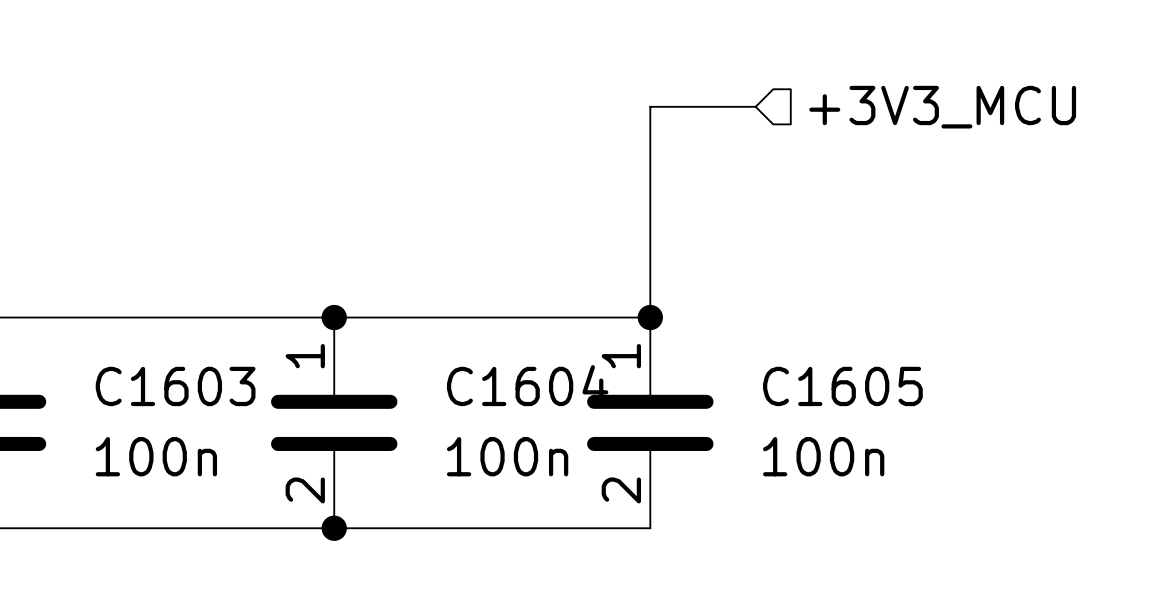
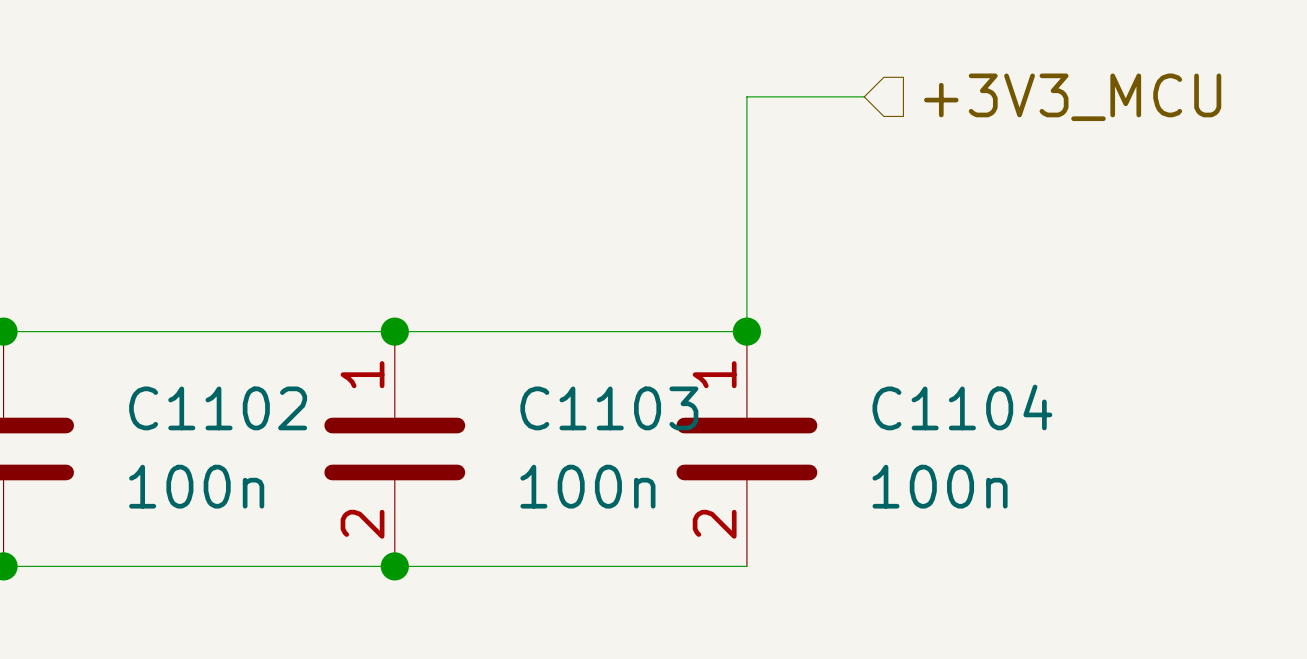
C1604 name: C1604 (527, 385) -> C1103 (609, 408)
C1603 name: C1603 (175, 386) -> C1102 (218, 408)
C1605 name: C1605 (842, 386) -> C1104 (962, 407)

